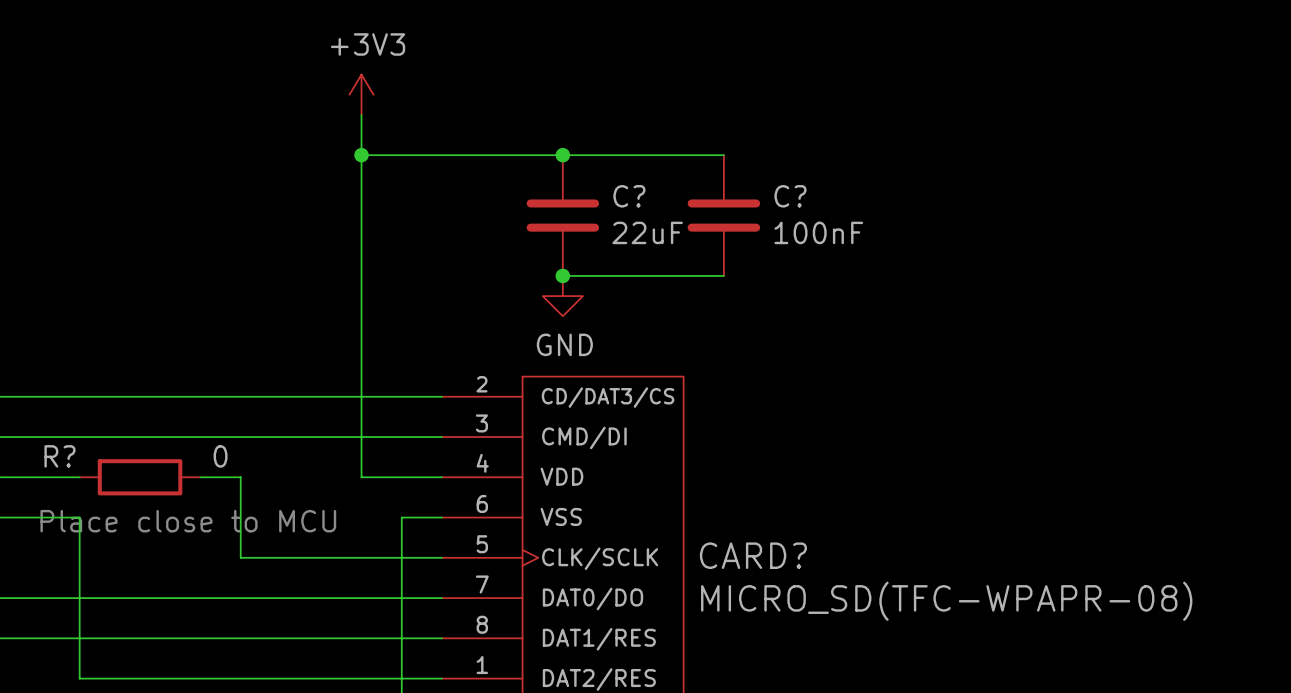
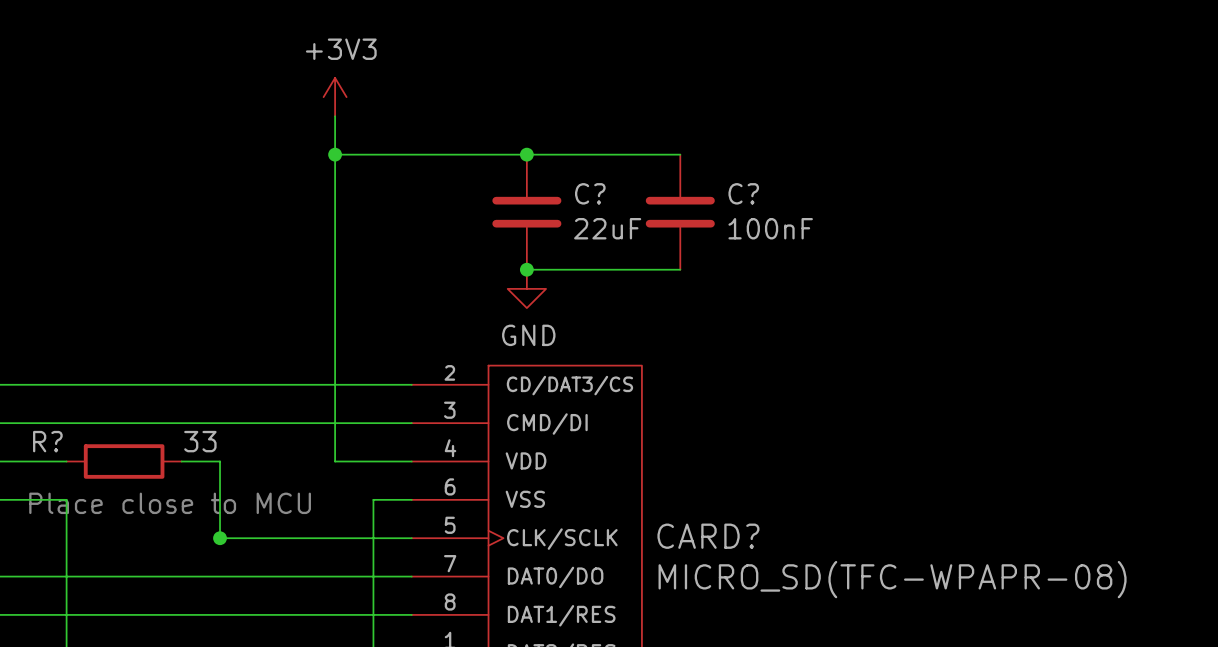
R? value: 0 (220, 456) -> 33 (200, 441)
junction: none -> (220, 538)

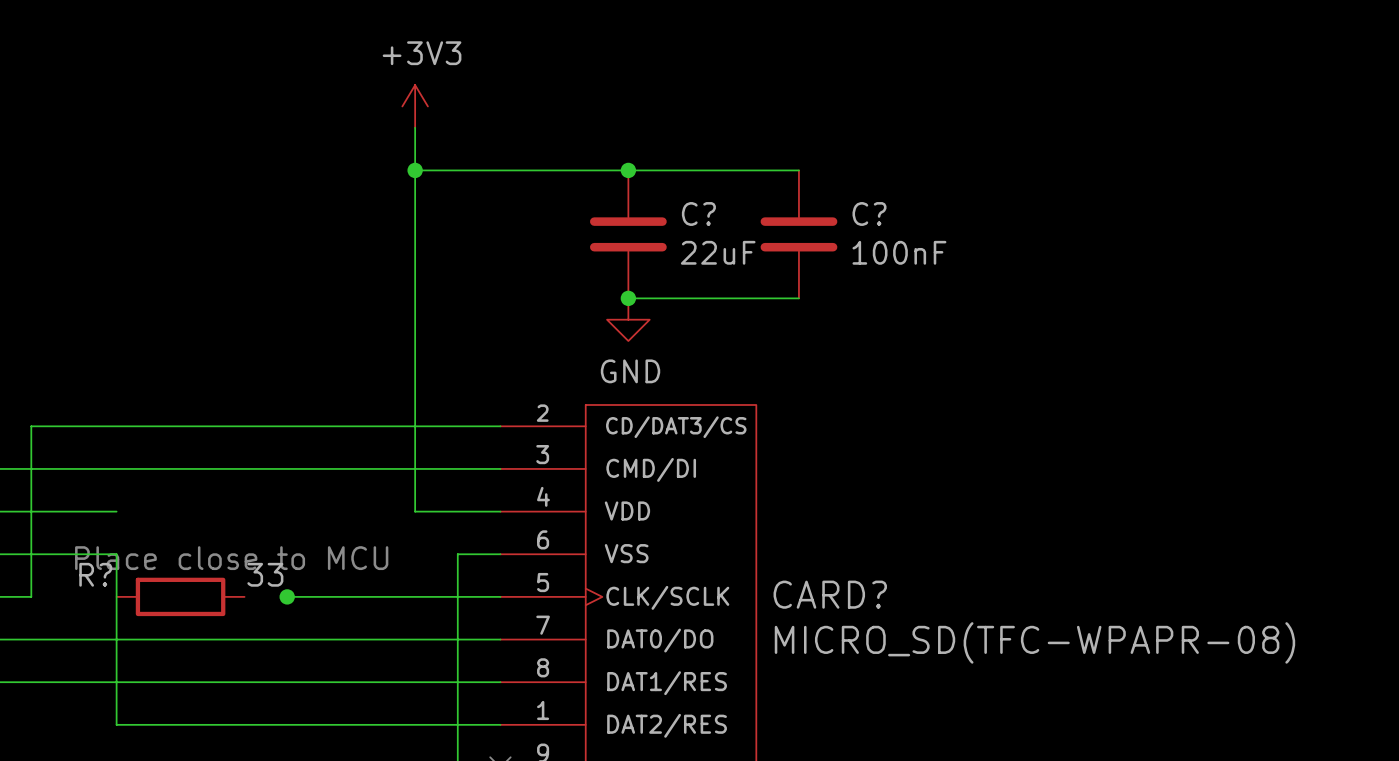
R? position: (124, 461) -> (180, 596)
wire: (181, 461) (220, 461) (220, 538) -> none

